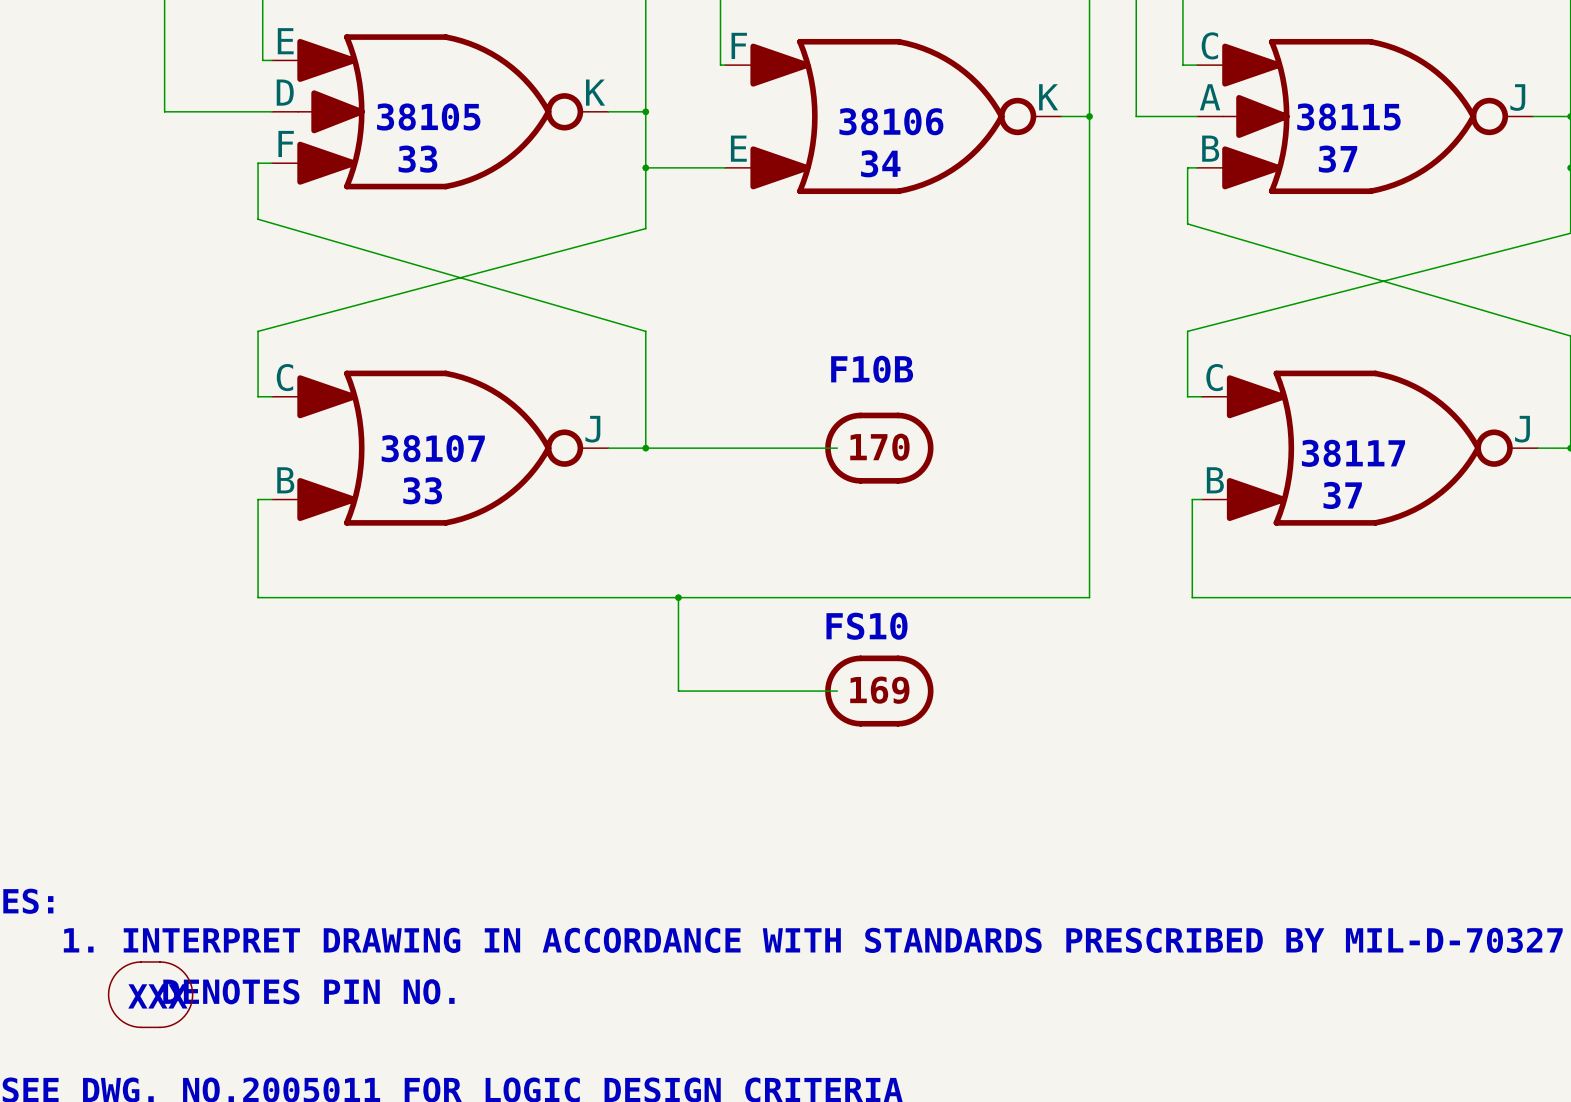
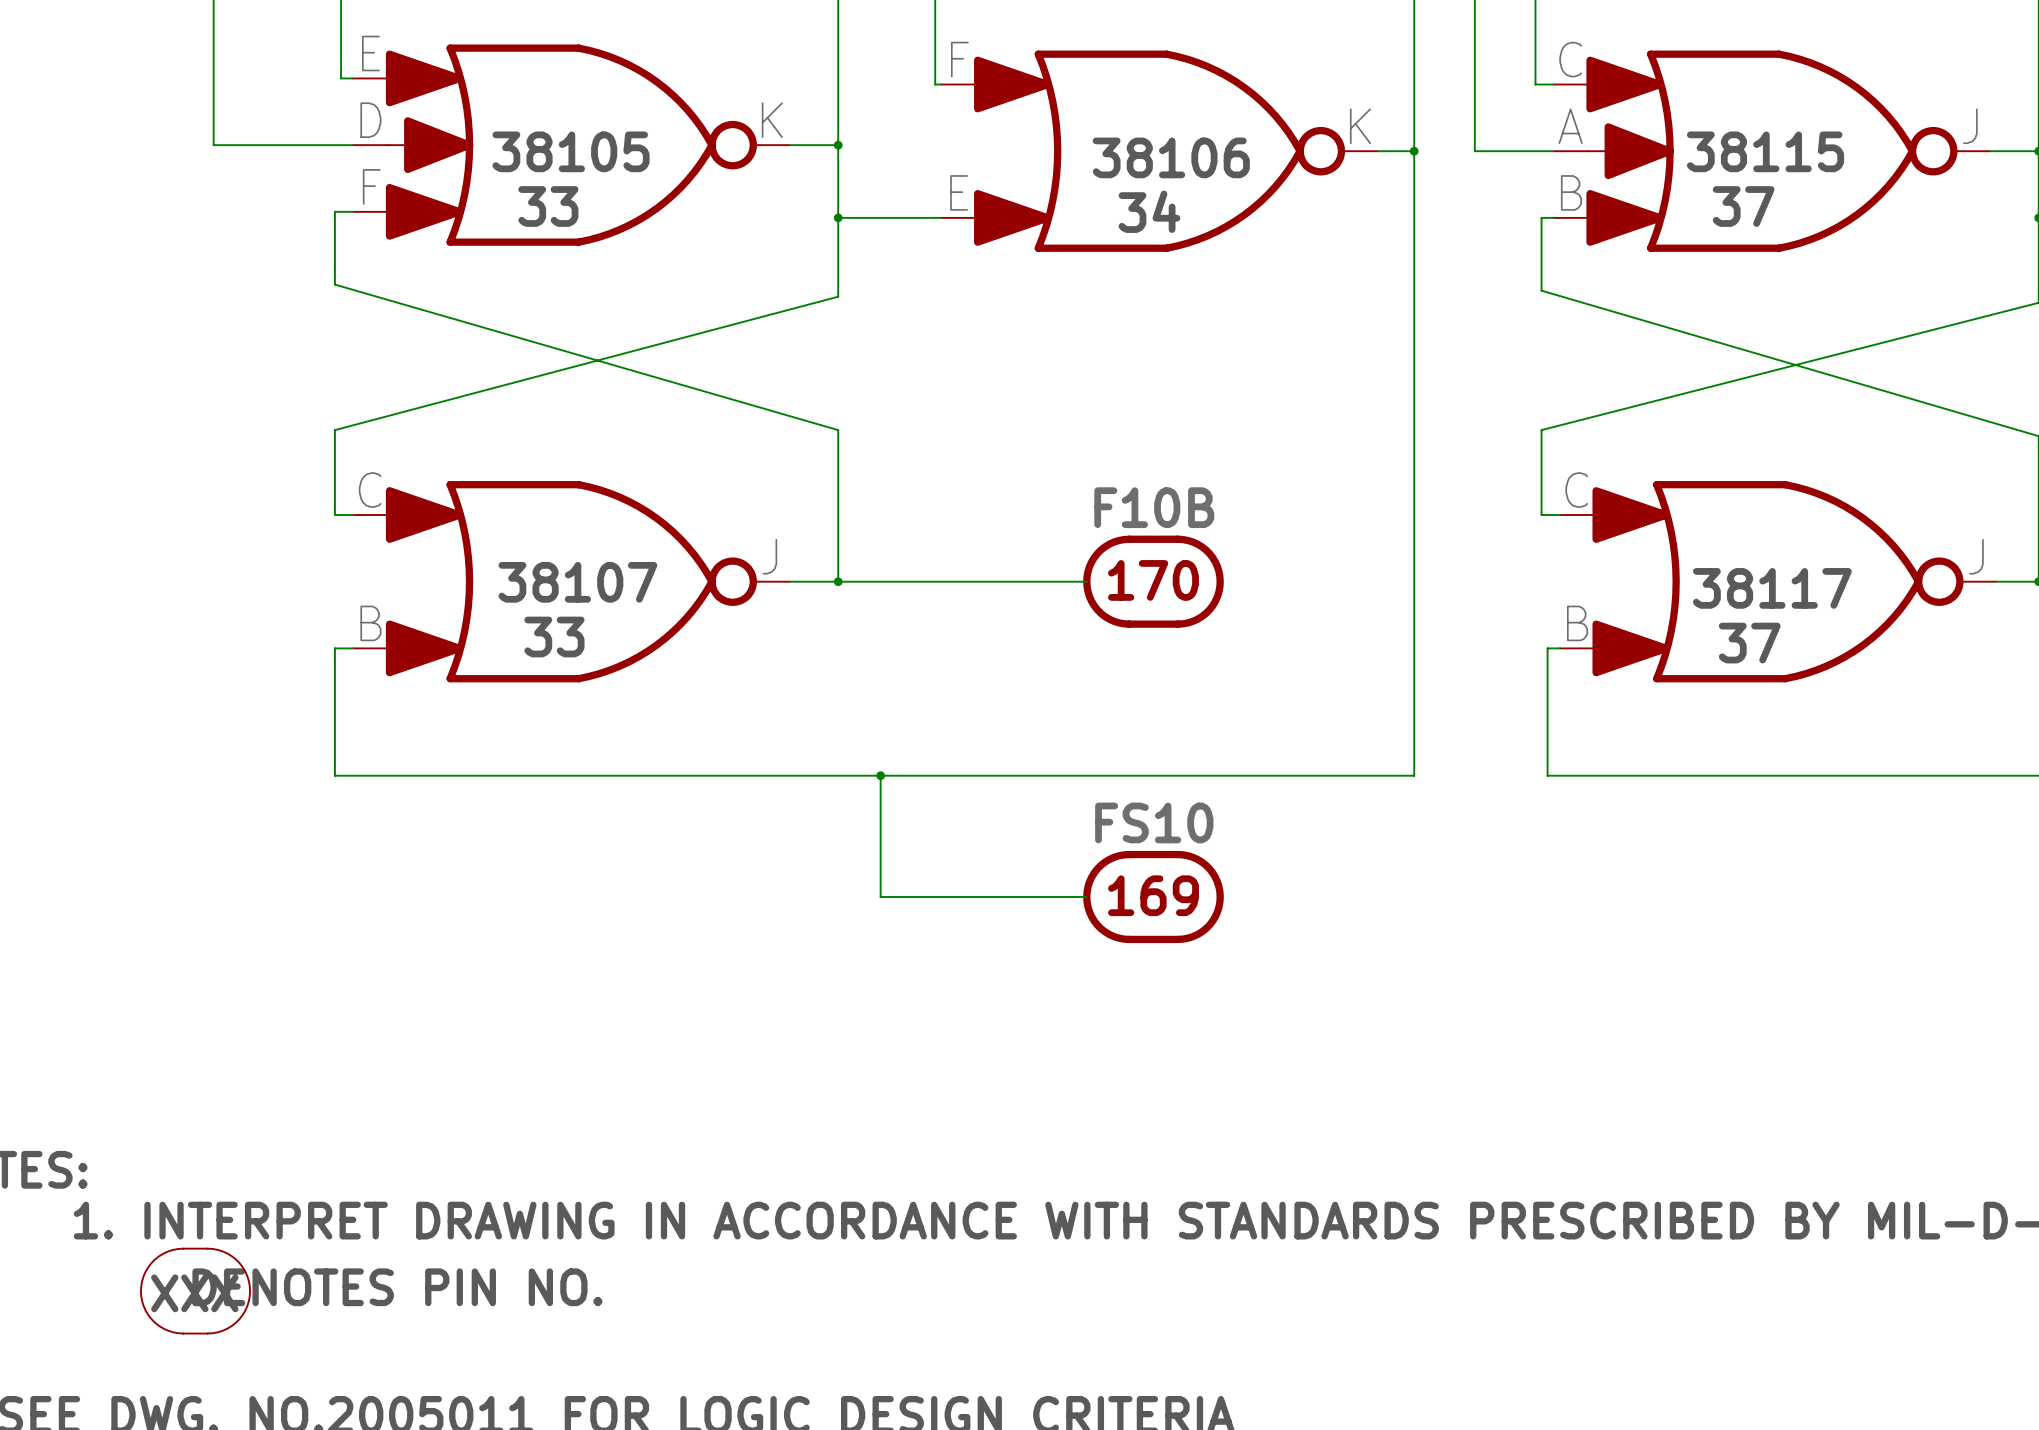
text: F10B (872, 369) -> none
part: (879, 448) -> none
part: none -> (1153, 581)
text: FS10 (866, 626) -> none
part: (879, 691) -> none
part: none -> (1153, 896)

